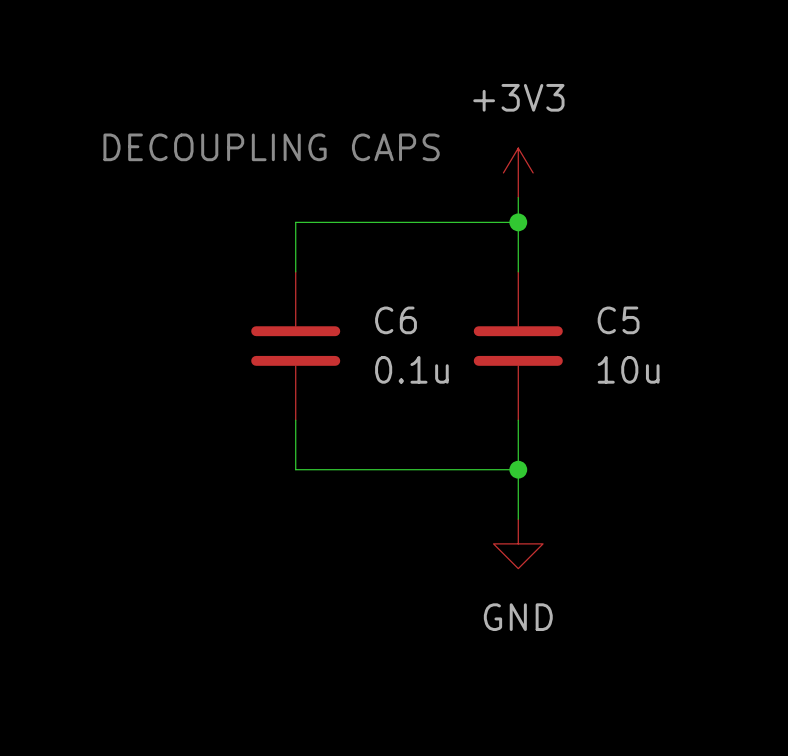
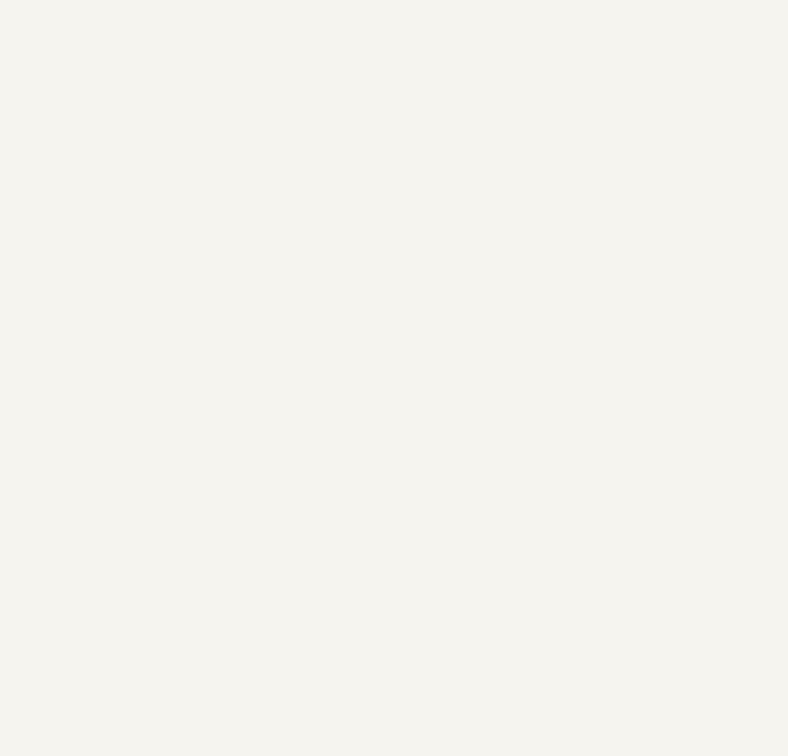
text: DECOUPLING CAPS (271, 147) -> none
power symbol: +3V3 (518, 172) -> none
wire: (518, 197) (518, 271) -> none
wire: (518, 222) (295, 222) (295, 271) -> none
junction: (518, 222) -> none
C6: 0.1u (295, 346) -> none
C5: 10u (518, 346) -> none
wire: (295, 420) (295, 469) (518, 469) -> none
wire: (518, 420) (518, 519) -> none
junction: (518, 469) -> none
power symbol: GND (518, 543) -> none

